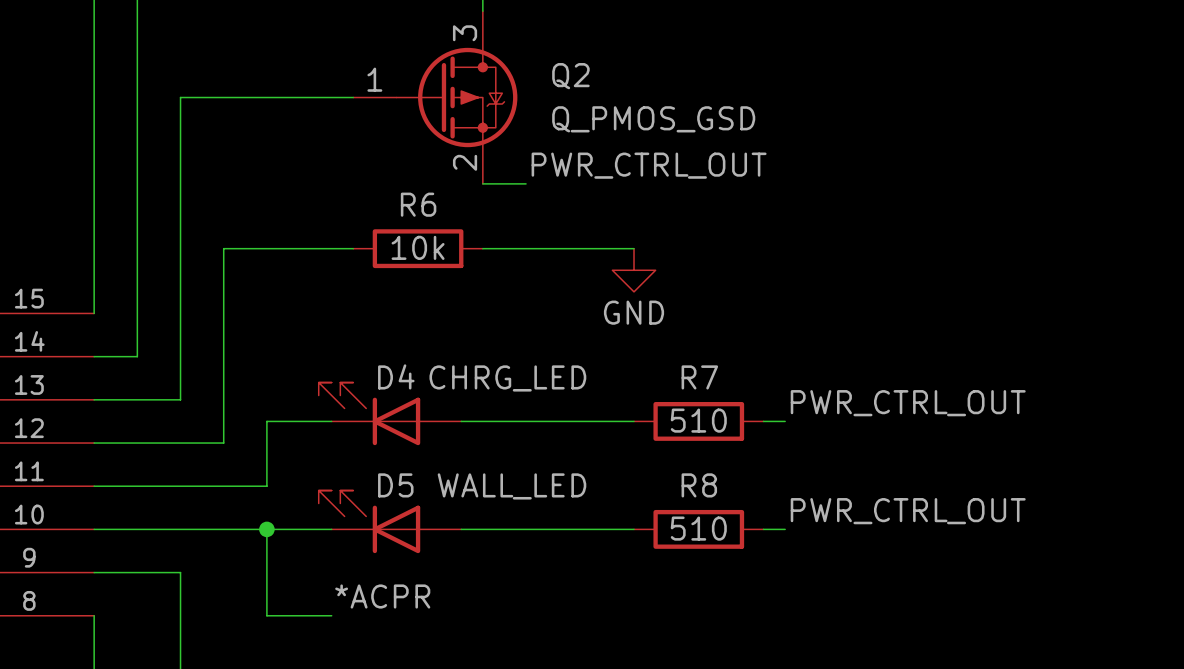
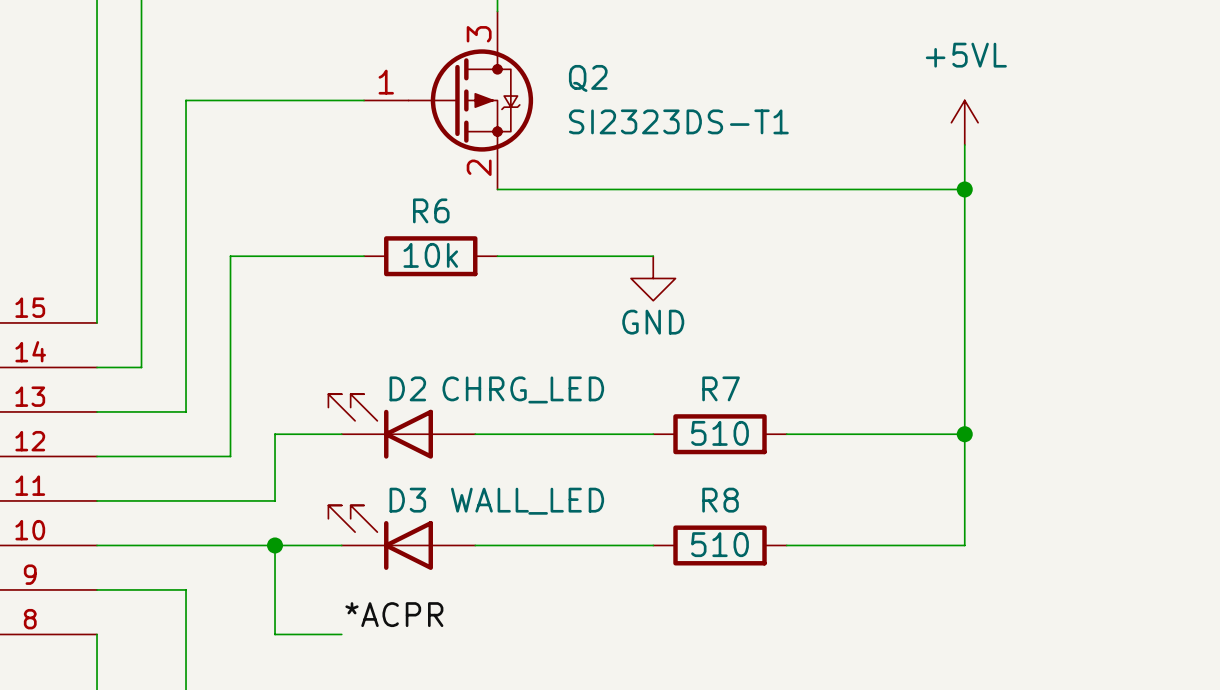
Q2 value: Q_PMOS_GSD (653, 119) -> SI2323DS-T1 (678, 121)
power symbol: none -> +5VL (964, 122)
wire: none -> (964, 144) (964, 545) (809, 545)
label: PWR_CTRL_OUT (649, 165) -> none
wire: none -> (542, 189) (964, 189)
junction: none -> (964, 189)
D4 name: D4 (396, 376) -> D2 (407, 388)
label: PWR_CTRL_OUT (908, 403) -> none
wire: none -> (809, 434) (964, 434)
junction: none -> (964, 434)
D5 name: D5 (395, 485) -> D3 (407, 500)
label: PWR_CTRL_OUT (908, 511) -> none

